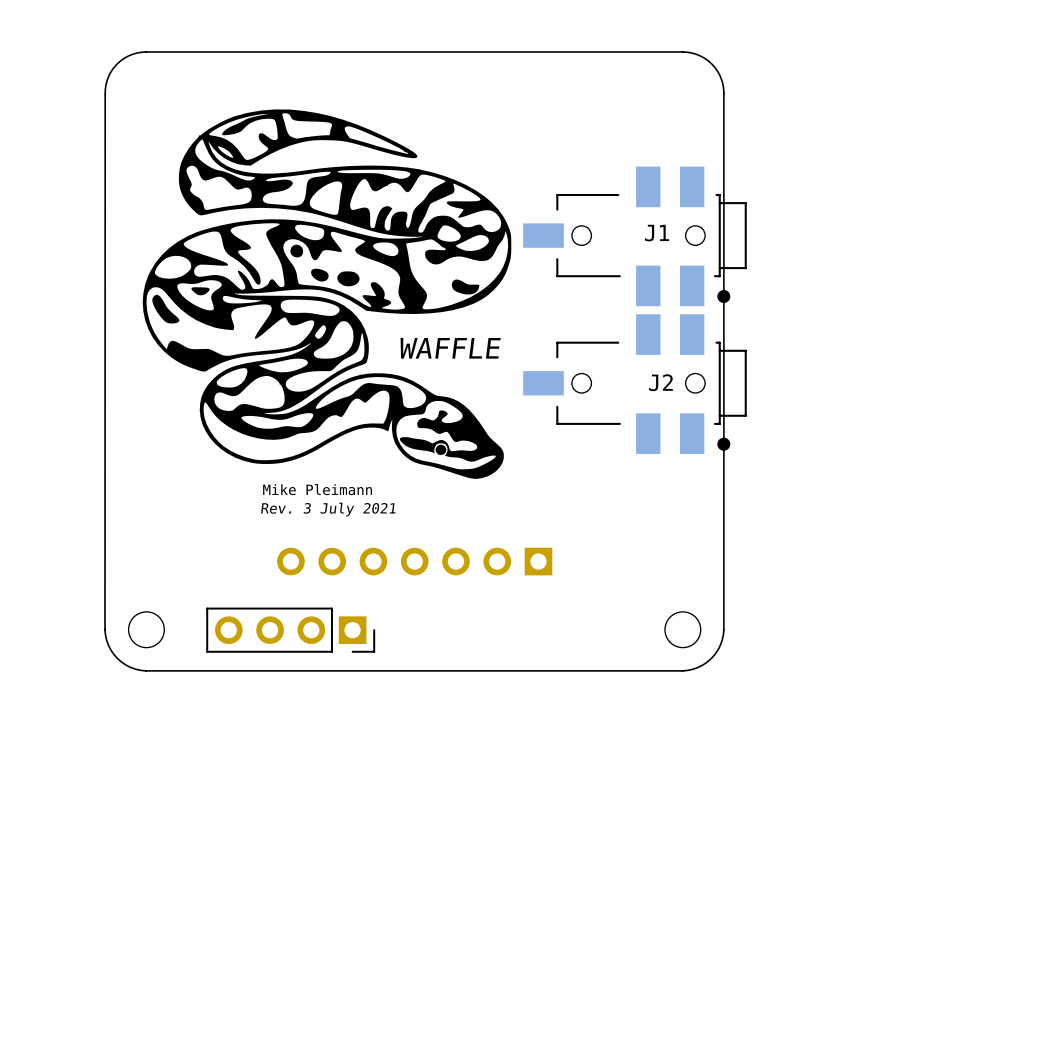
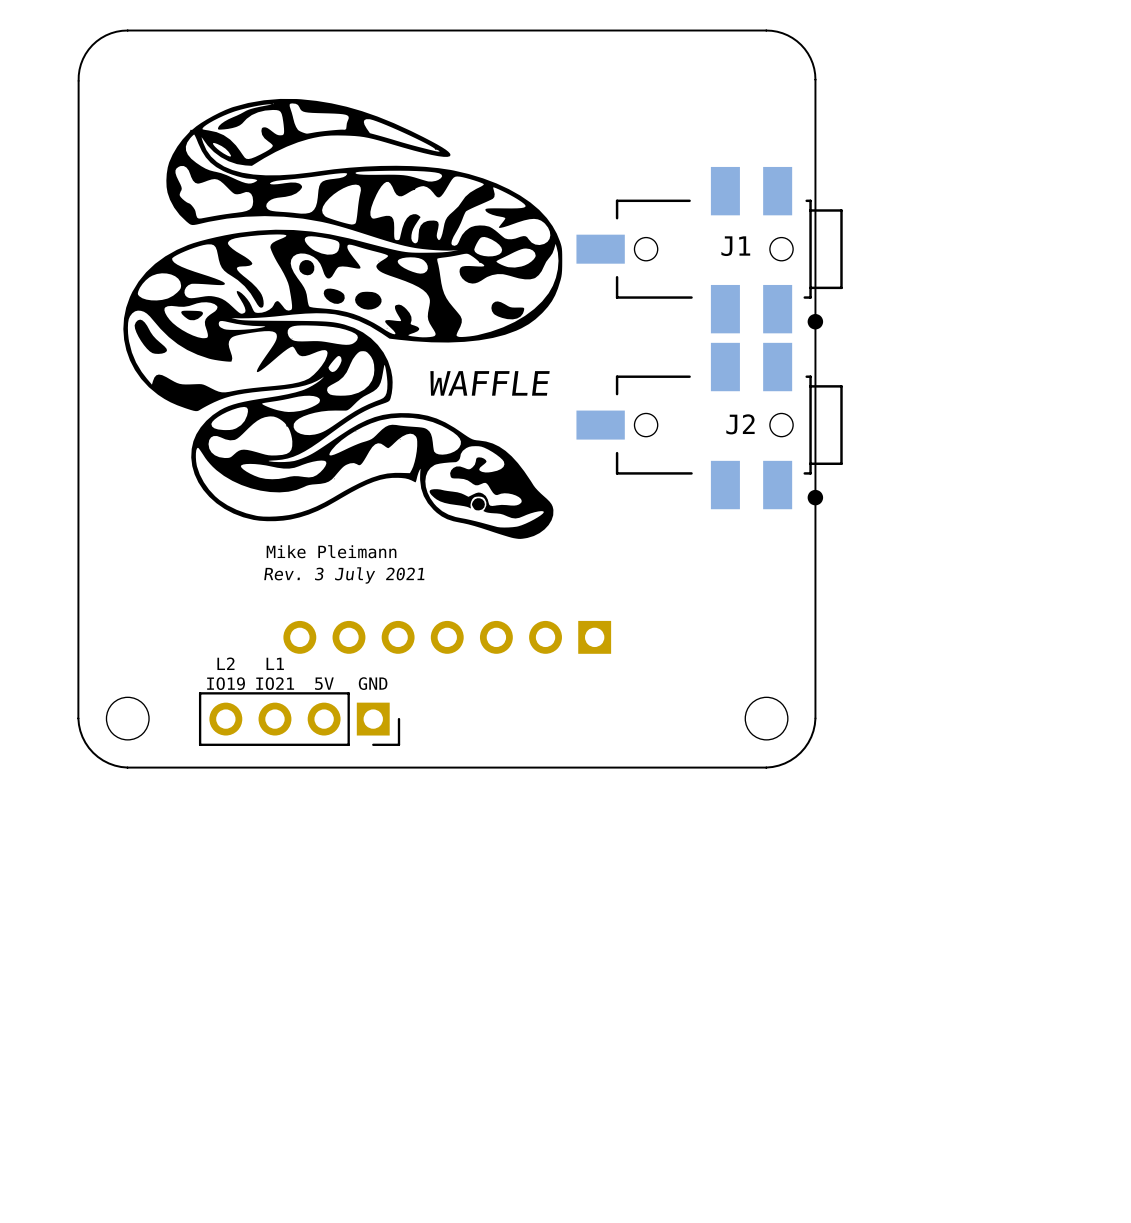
text: none -> L2 (225, 663)
text: none -> L1 (275, 663)
text: none -> IO19 (226, 683)
text: none -> IO21 (275, 683)
text: none -> 5V (324, 683)
text: none -> GND (373, 683)

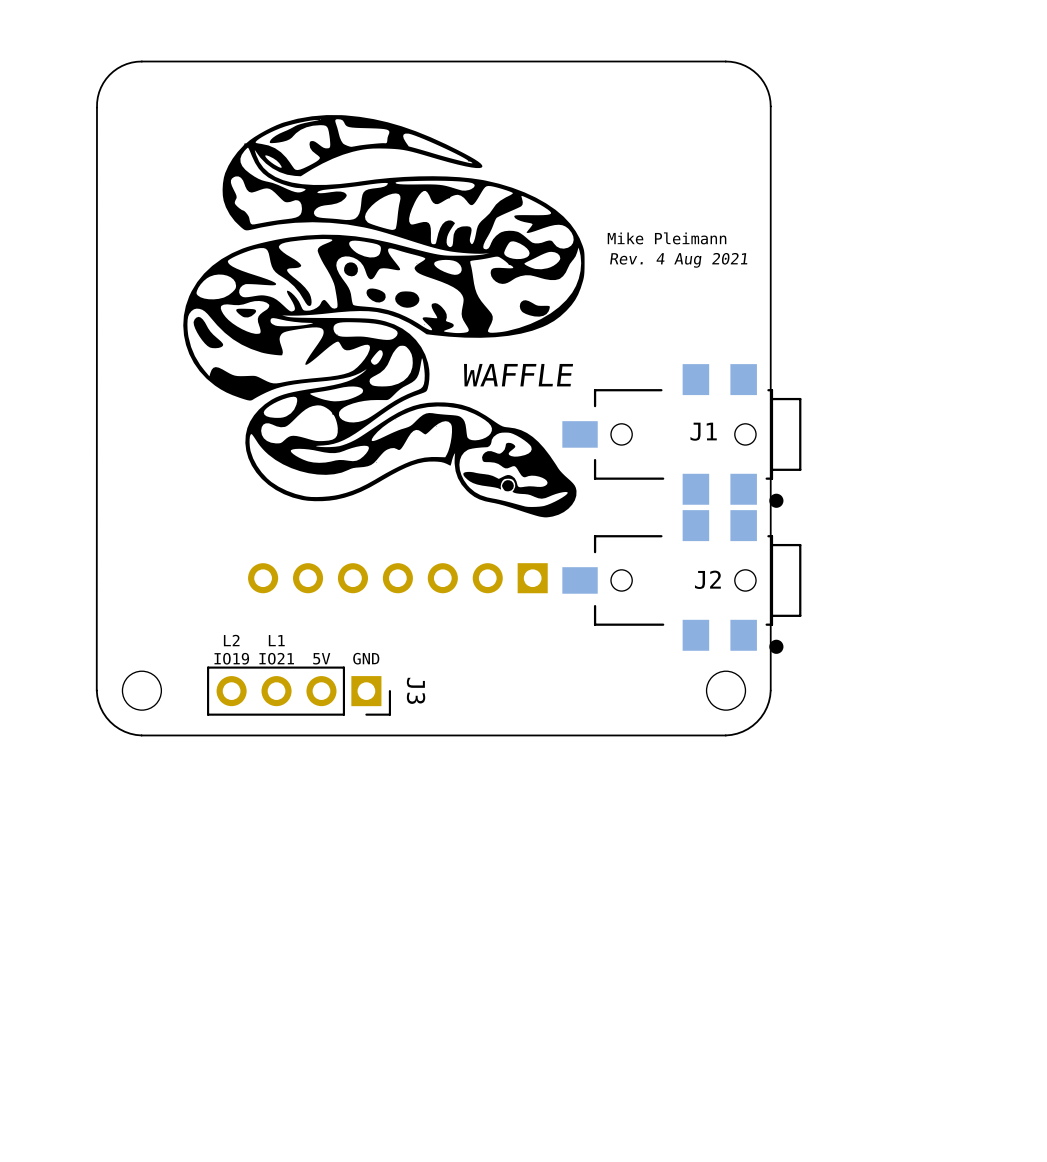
J1 footprint: [576, 166, 843, 334] -> [562, 364, 802, 508]
text: none -> Mike Pleimann (667, 238)
text: none -> Rev. 4 Aug 2021 (678, 260)
WAFFLE position: (342, 318) -> (383, 316)
J2 footprint: [576, 342, 843, 510] -> [562, 510, 802, 654]
text: Mike Pleimann (331, 551) -> none
text: Rev. 3 July 2021 (344, 575) -> none
part position: (447, 637) -> (397, 578)
J3 name: none -> J3 (416, 690)

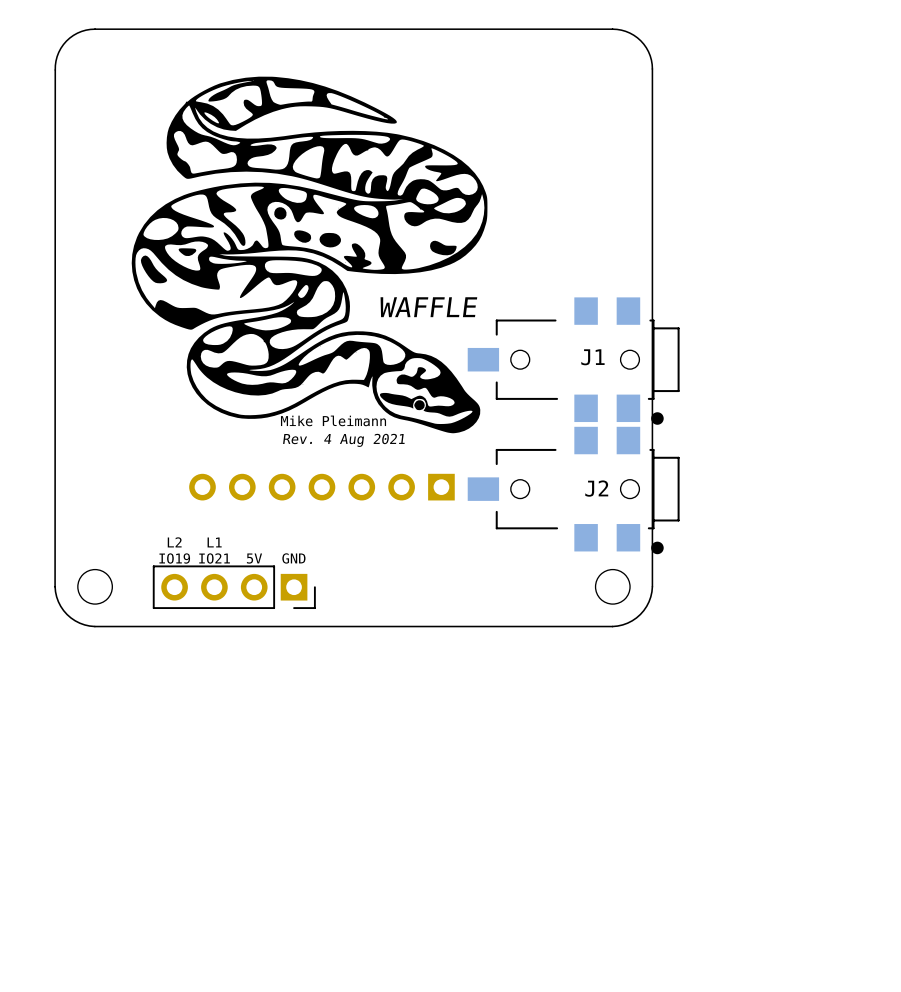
text position: Mike Pleimann (667, 238) -> Mike Pleimann (333, 420)
text position: Rev. 4 Aug 2021 (678, 260) -> Rev. 4 Aug 2021 (343, 440)
J3 name: J3 (416, 690) -> none

